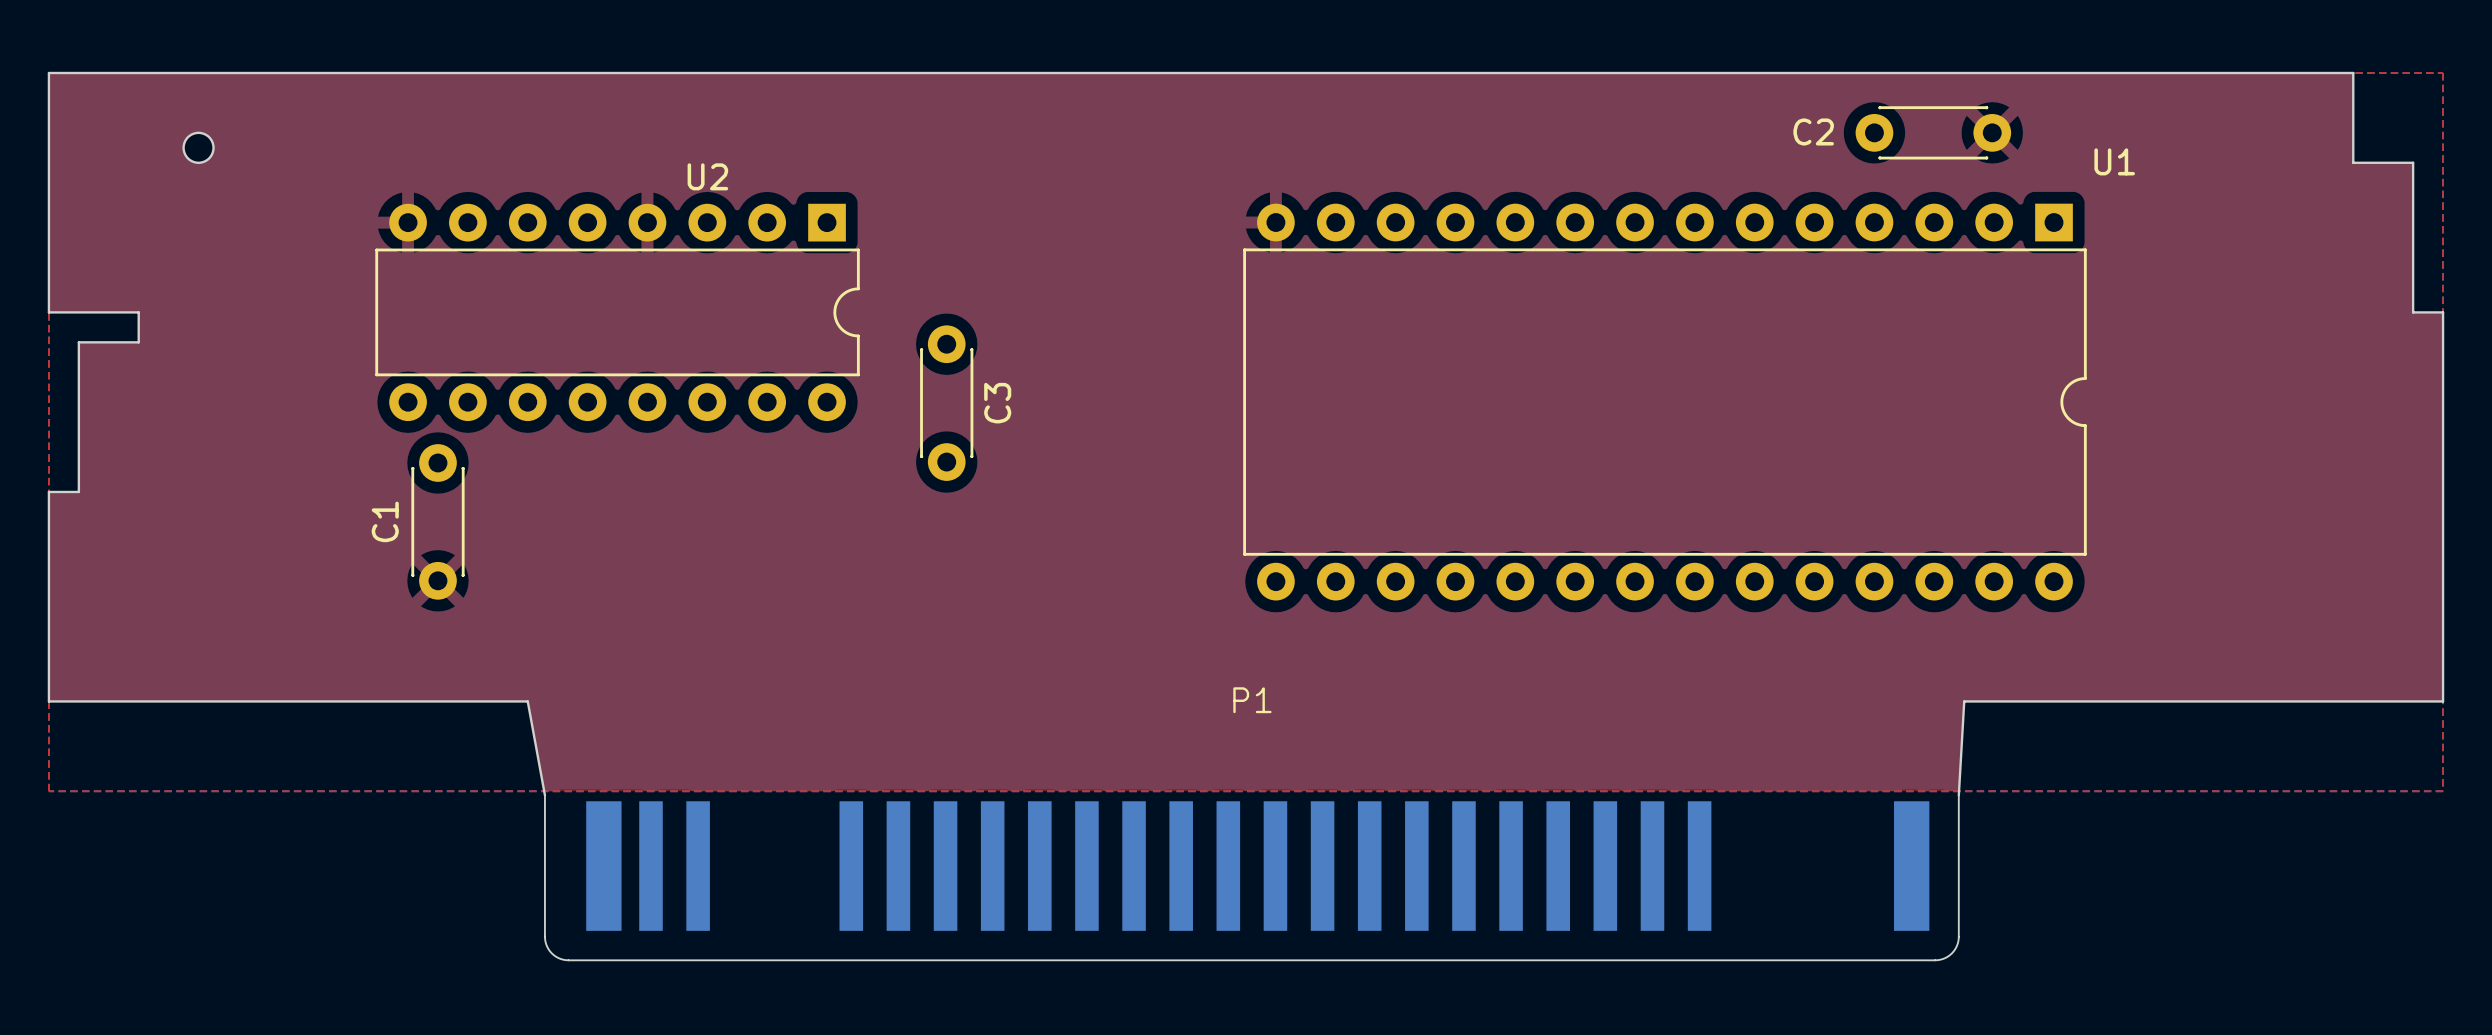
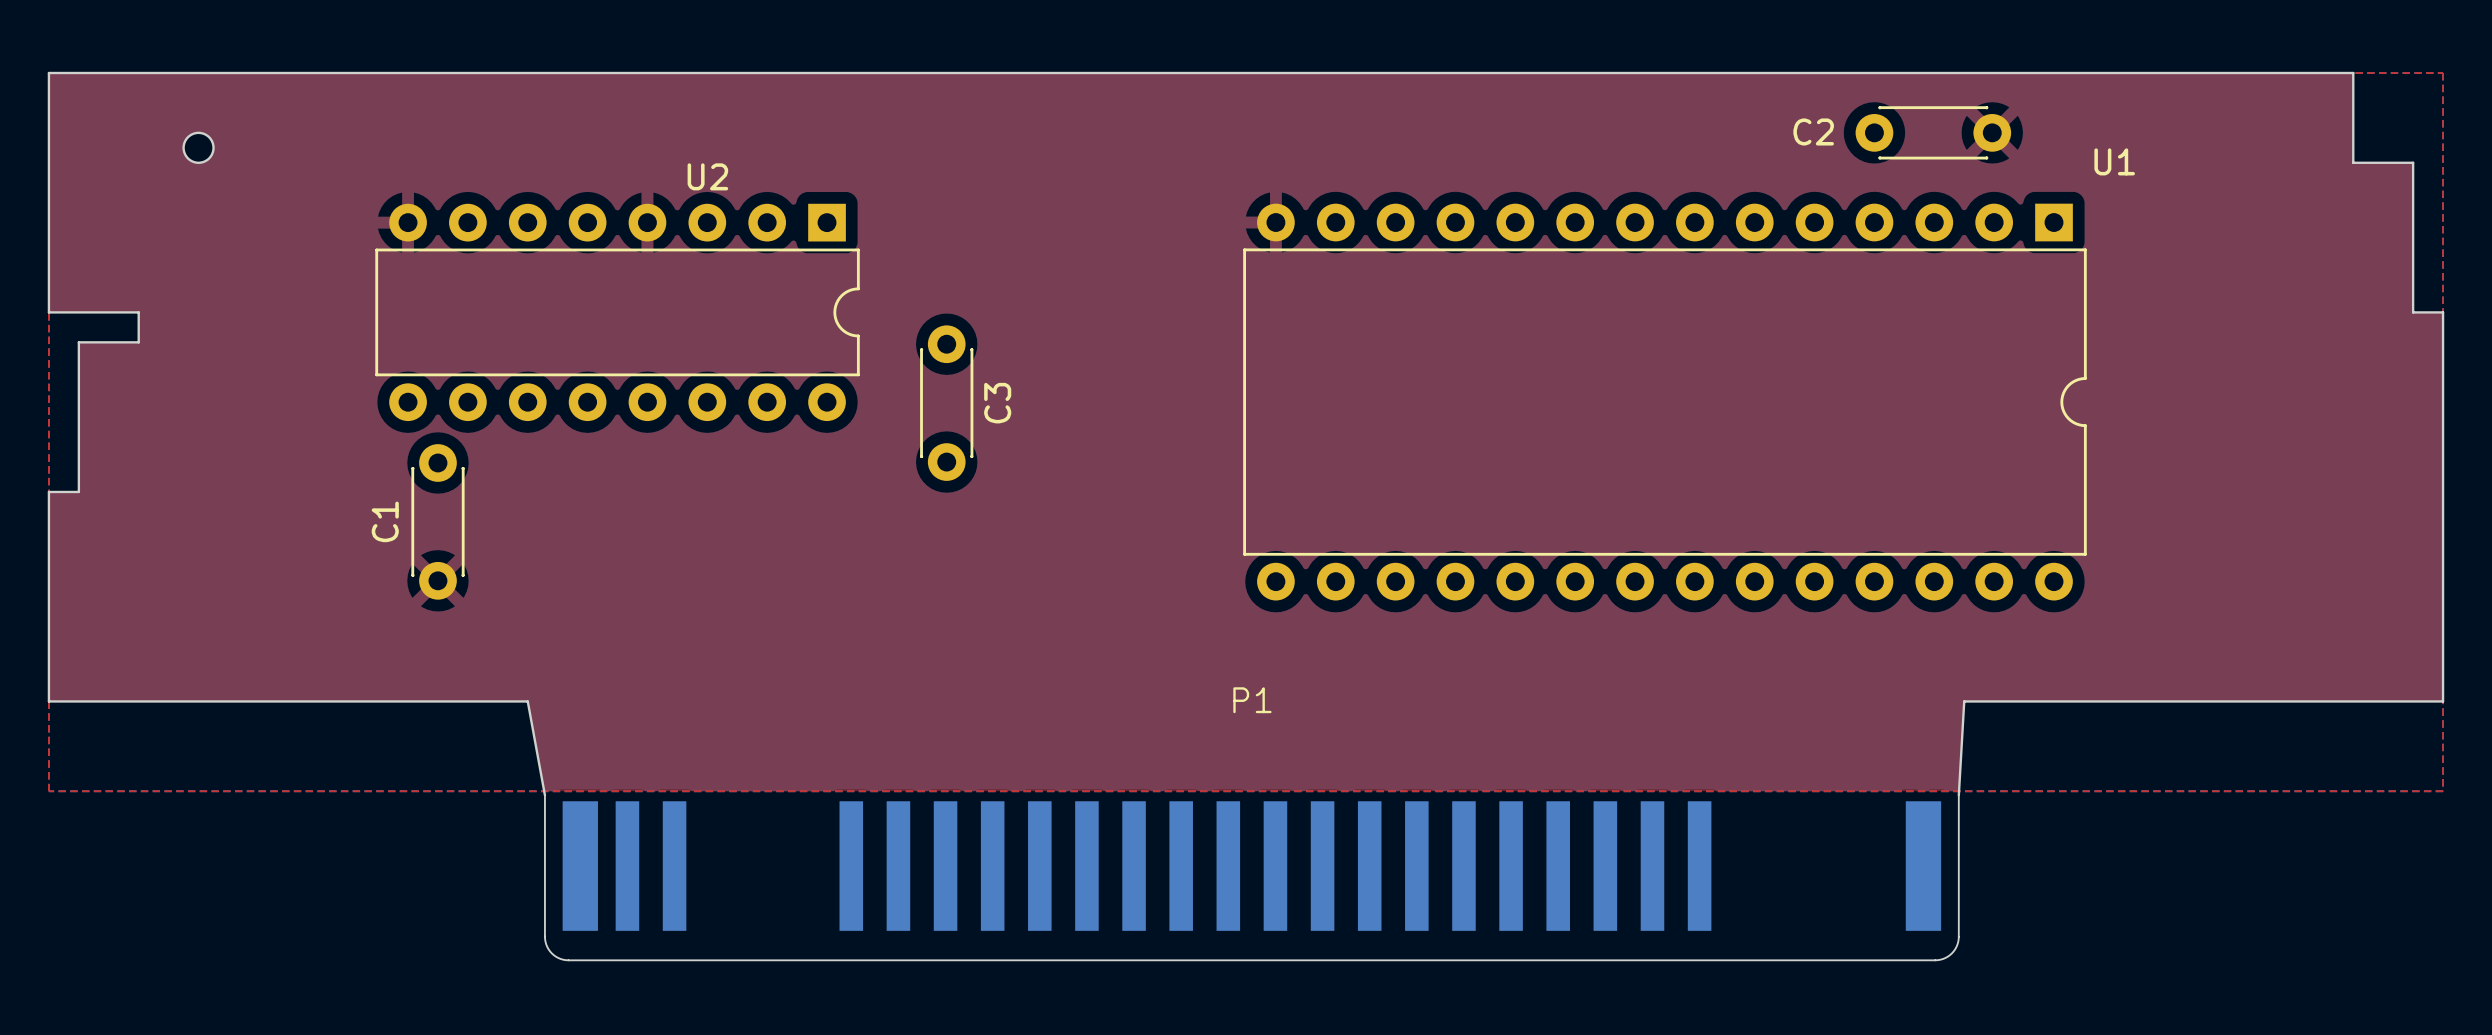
P1 footprint: [544, 794, 1960, 961] -> [544, 794, 1960, 961]

